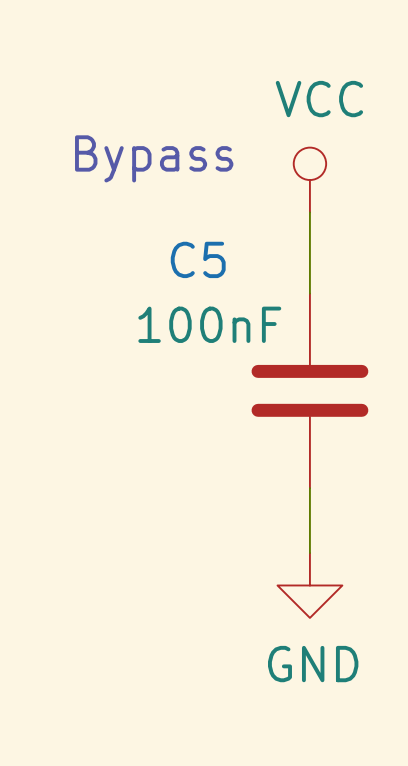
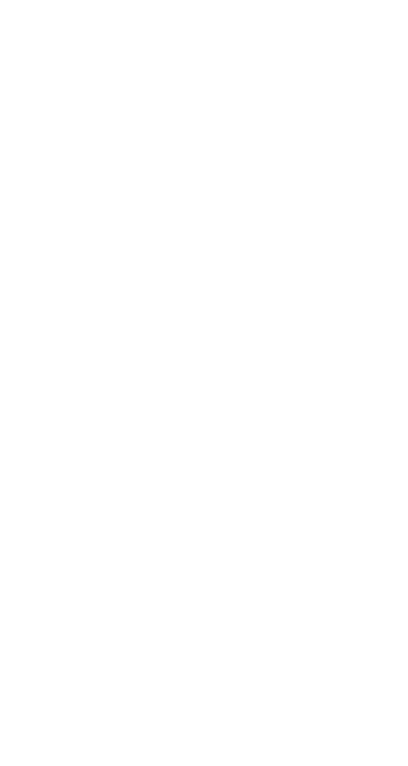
text: Bypass (154, 158) -> none
power symbol: VCC (309, 180) -> none
wire: (309, 212) (309, 293) -> none
C5: 100nF (309, 390) -> none
wire: (309, 488) (309, 553) -> none
power symbol: GND (309, 585) -> none

